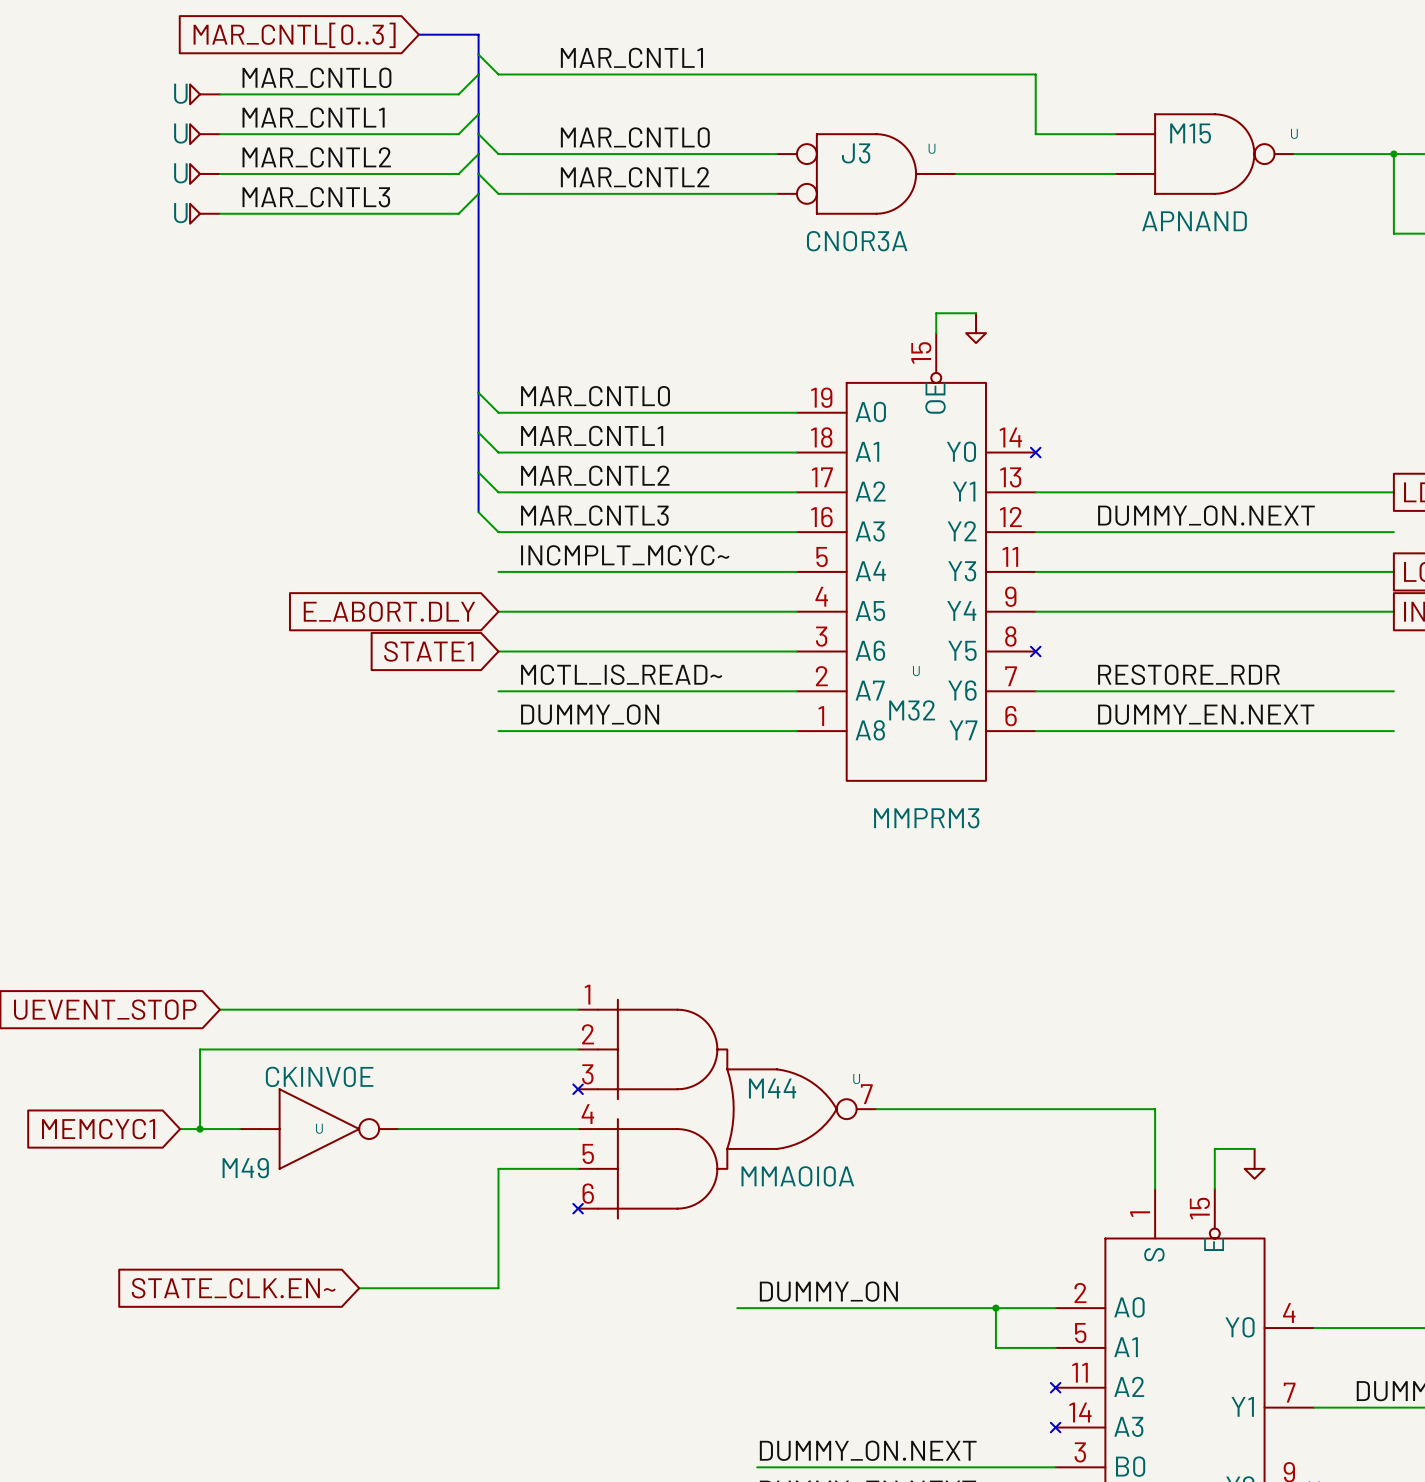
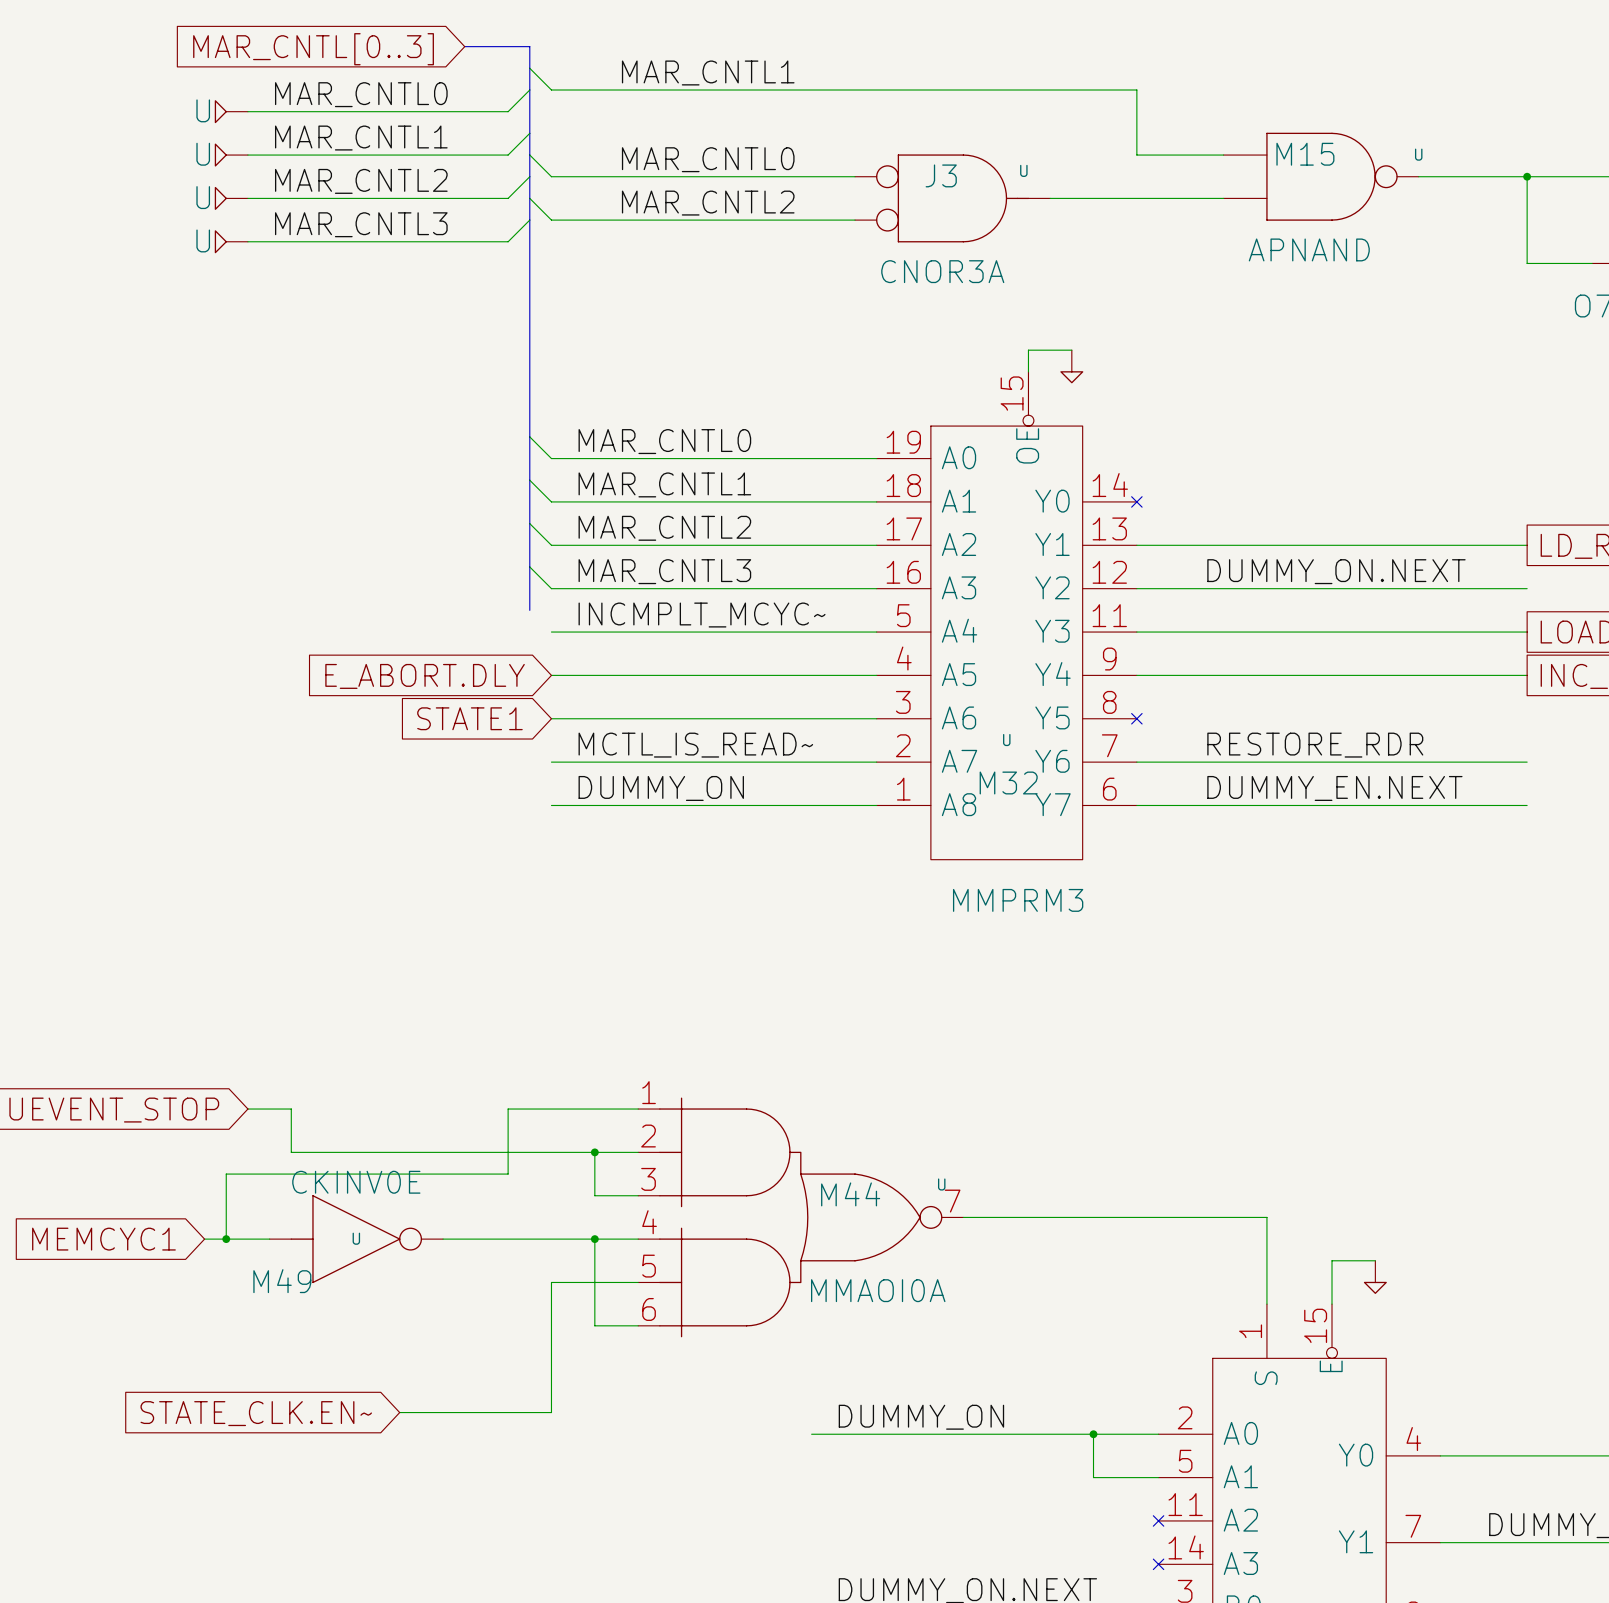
bus: none -> (529, 566) (529, 610)
wire: (259, 1009) (458, 1009) -> (226, 1174) (508, 1174) (508, 1109)
wire: (259, 1049) (200, 1049) (200, 1069) -> (291, 1152) (291, 1109)
wire: none -> (594, 1152) (594, 1195) (638, 1195)
junction: none -> (594, 1152)
no-connect mark: (578, 1089) -> none
wire: none -> (594, 1239) (594, 1325) (638, 1325)
junction: none -> (594, 1239)
no-connect mark: (578, 1208) -> none

